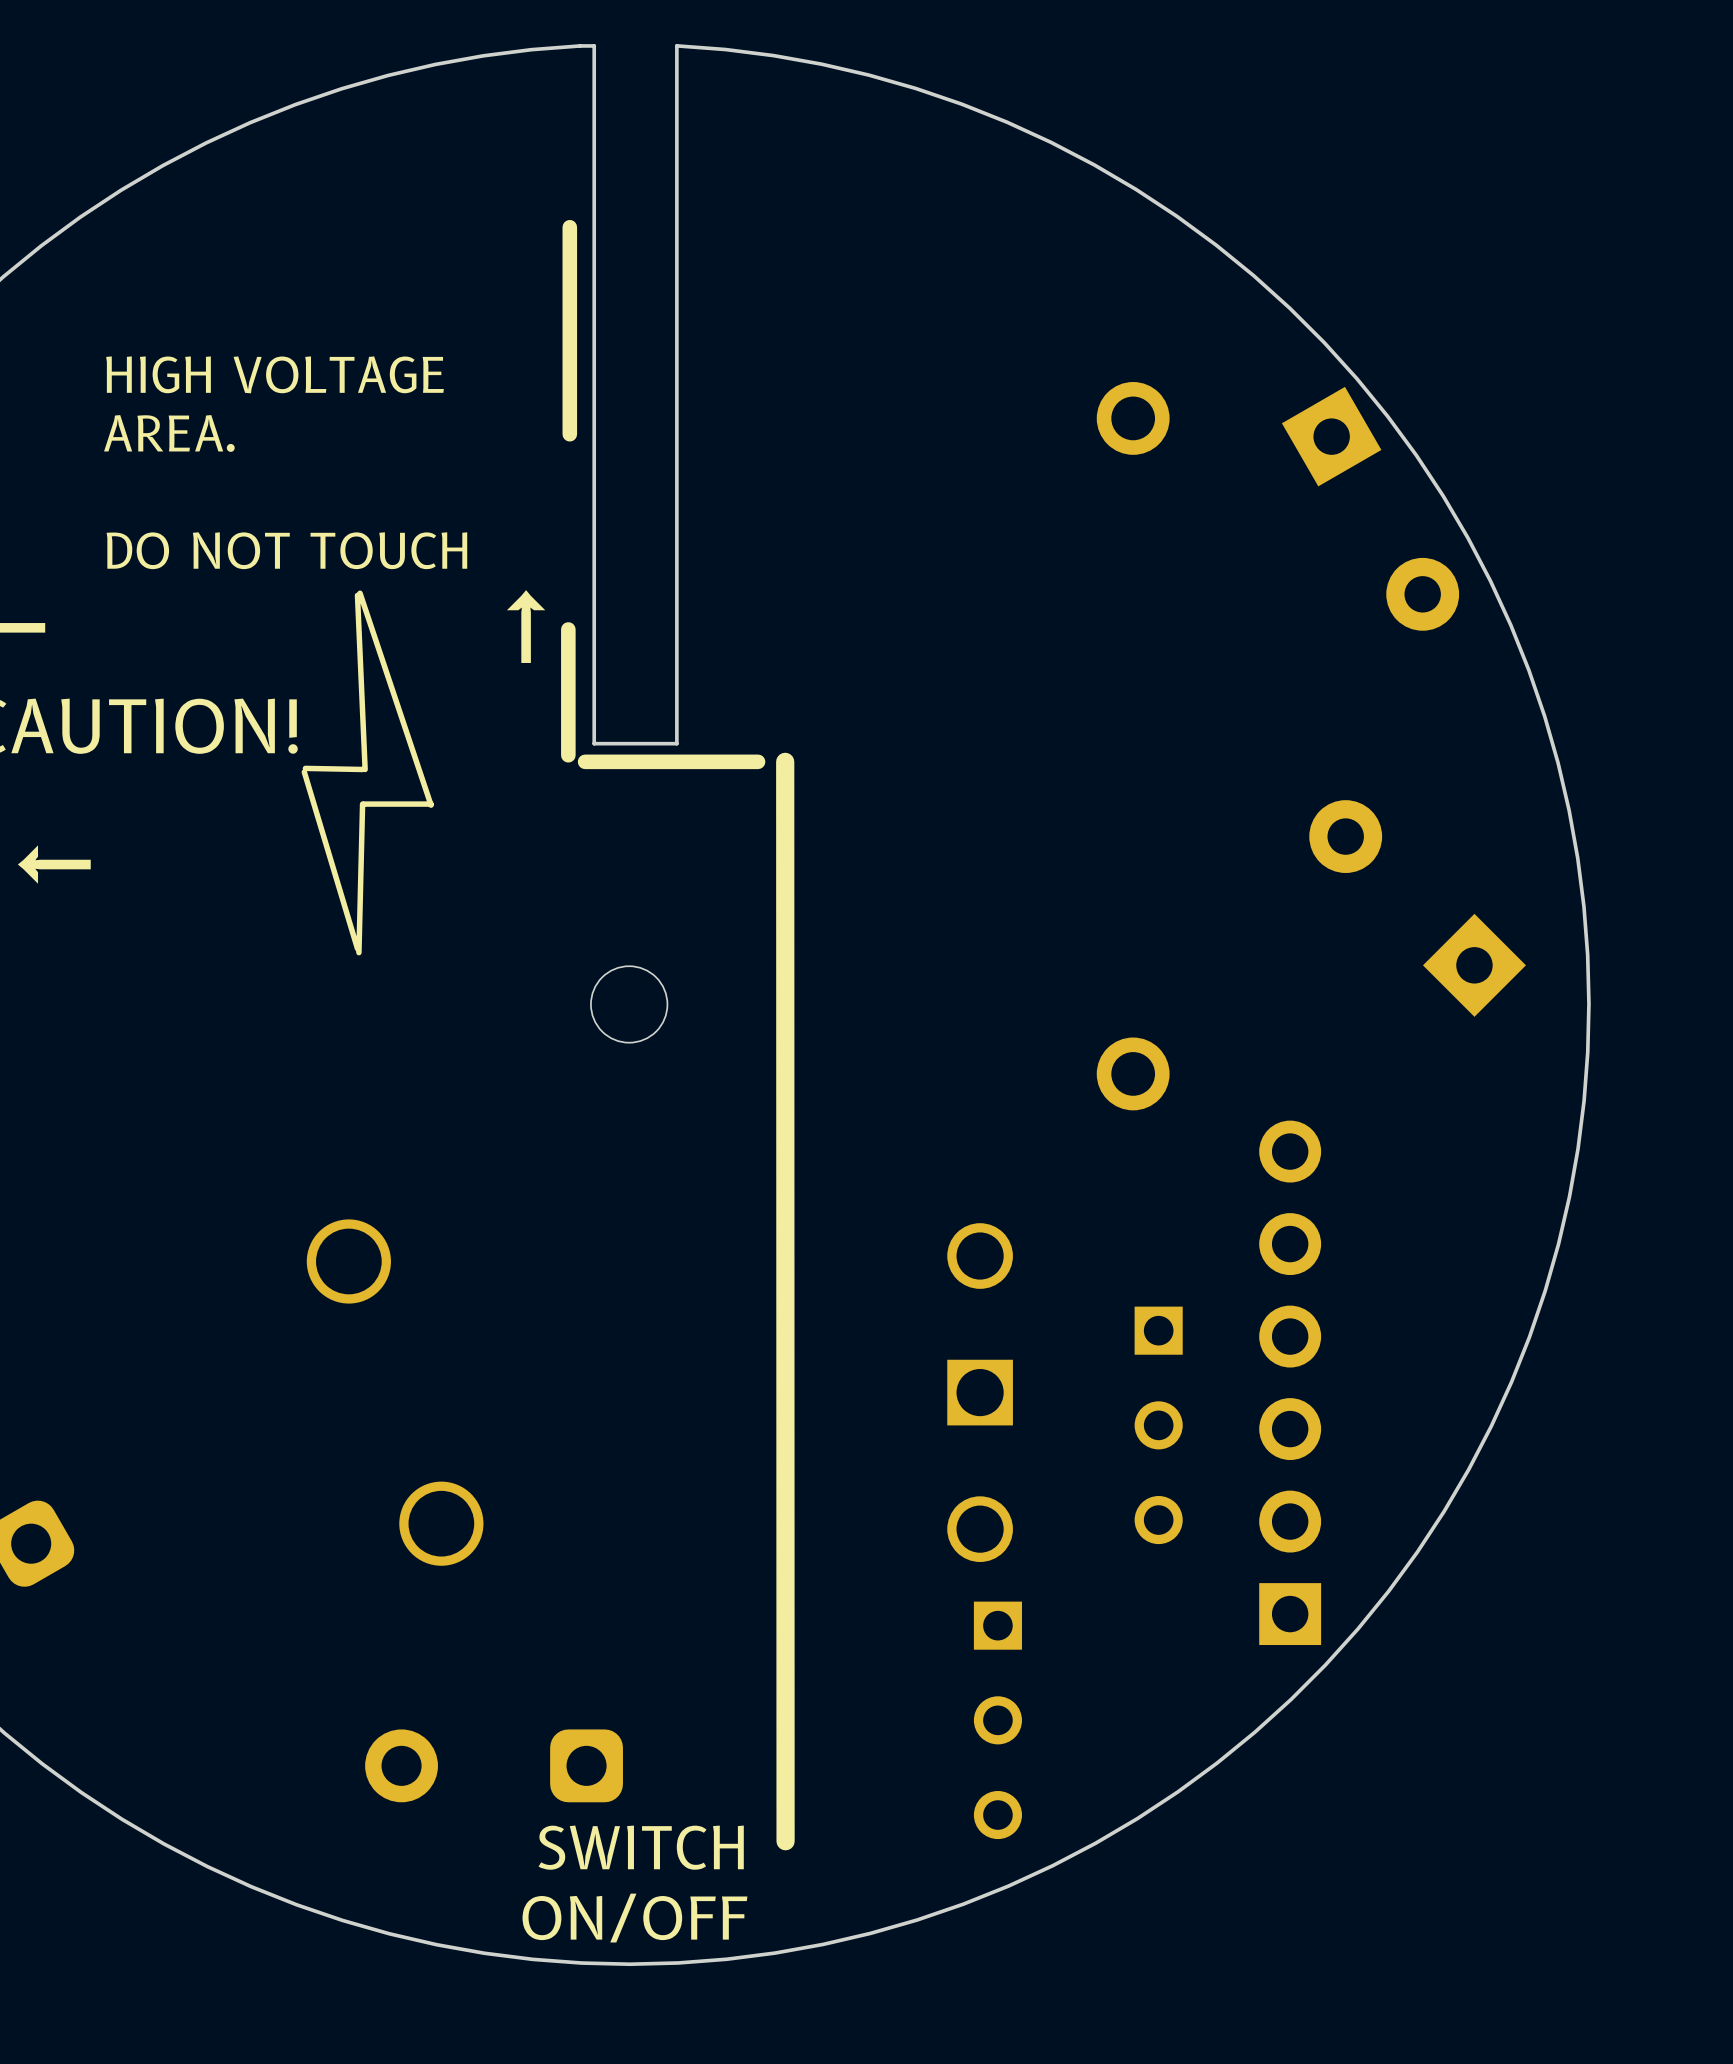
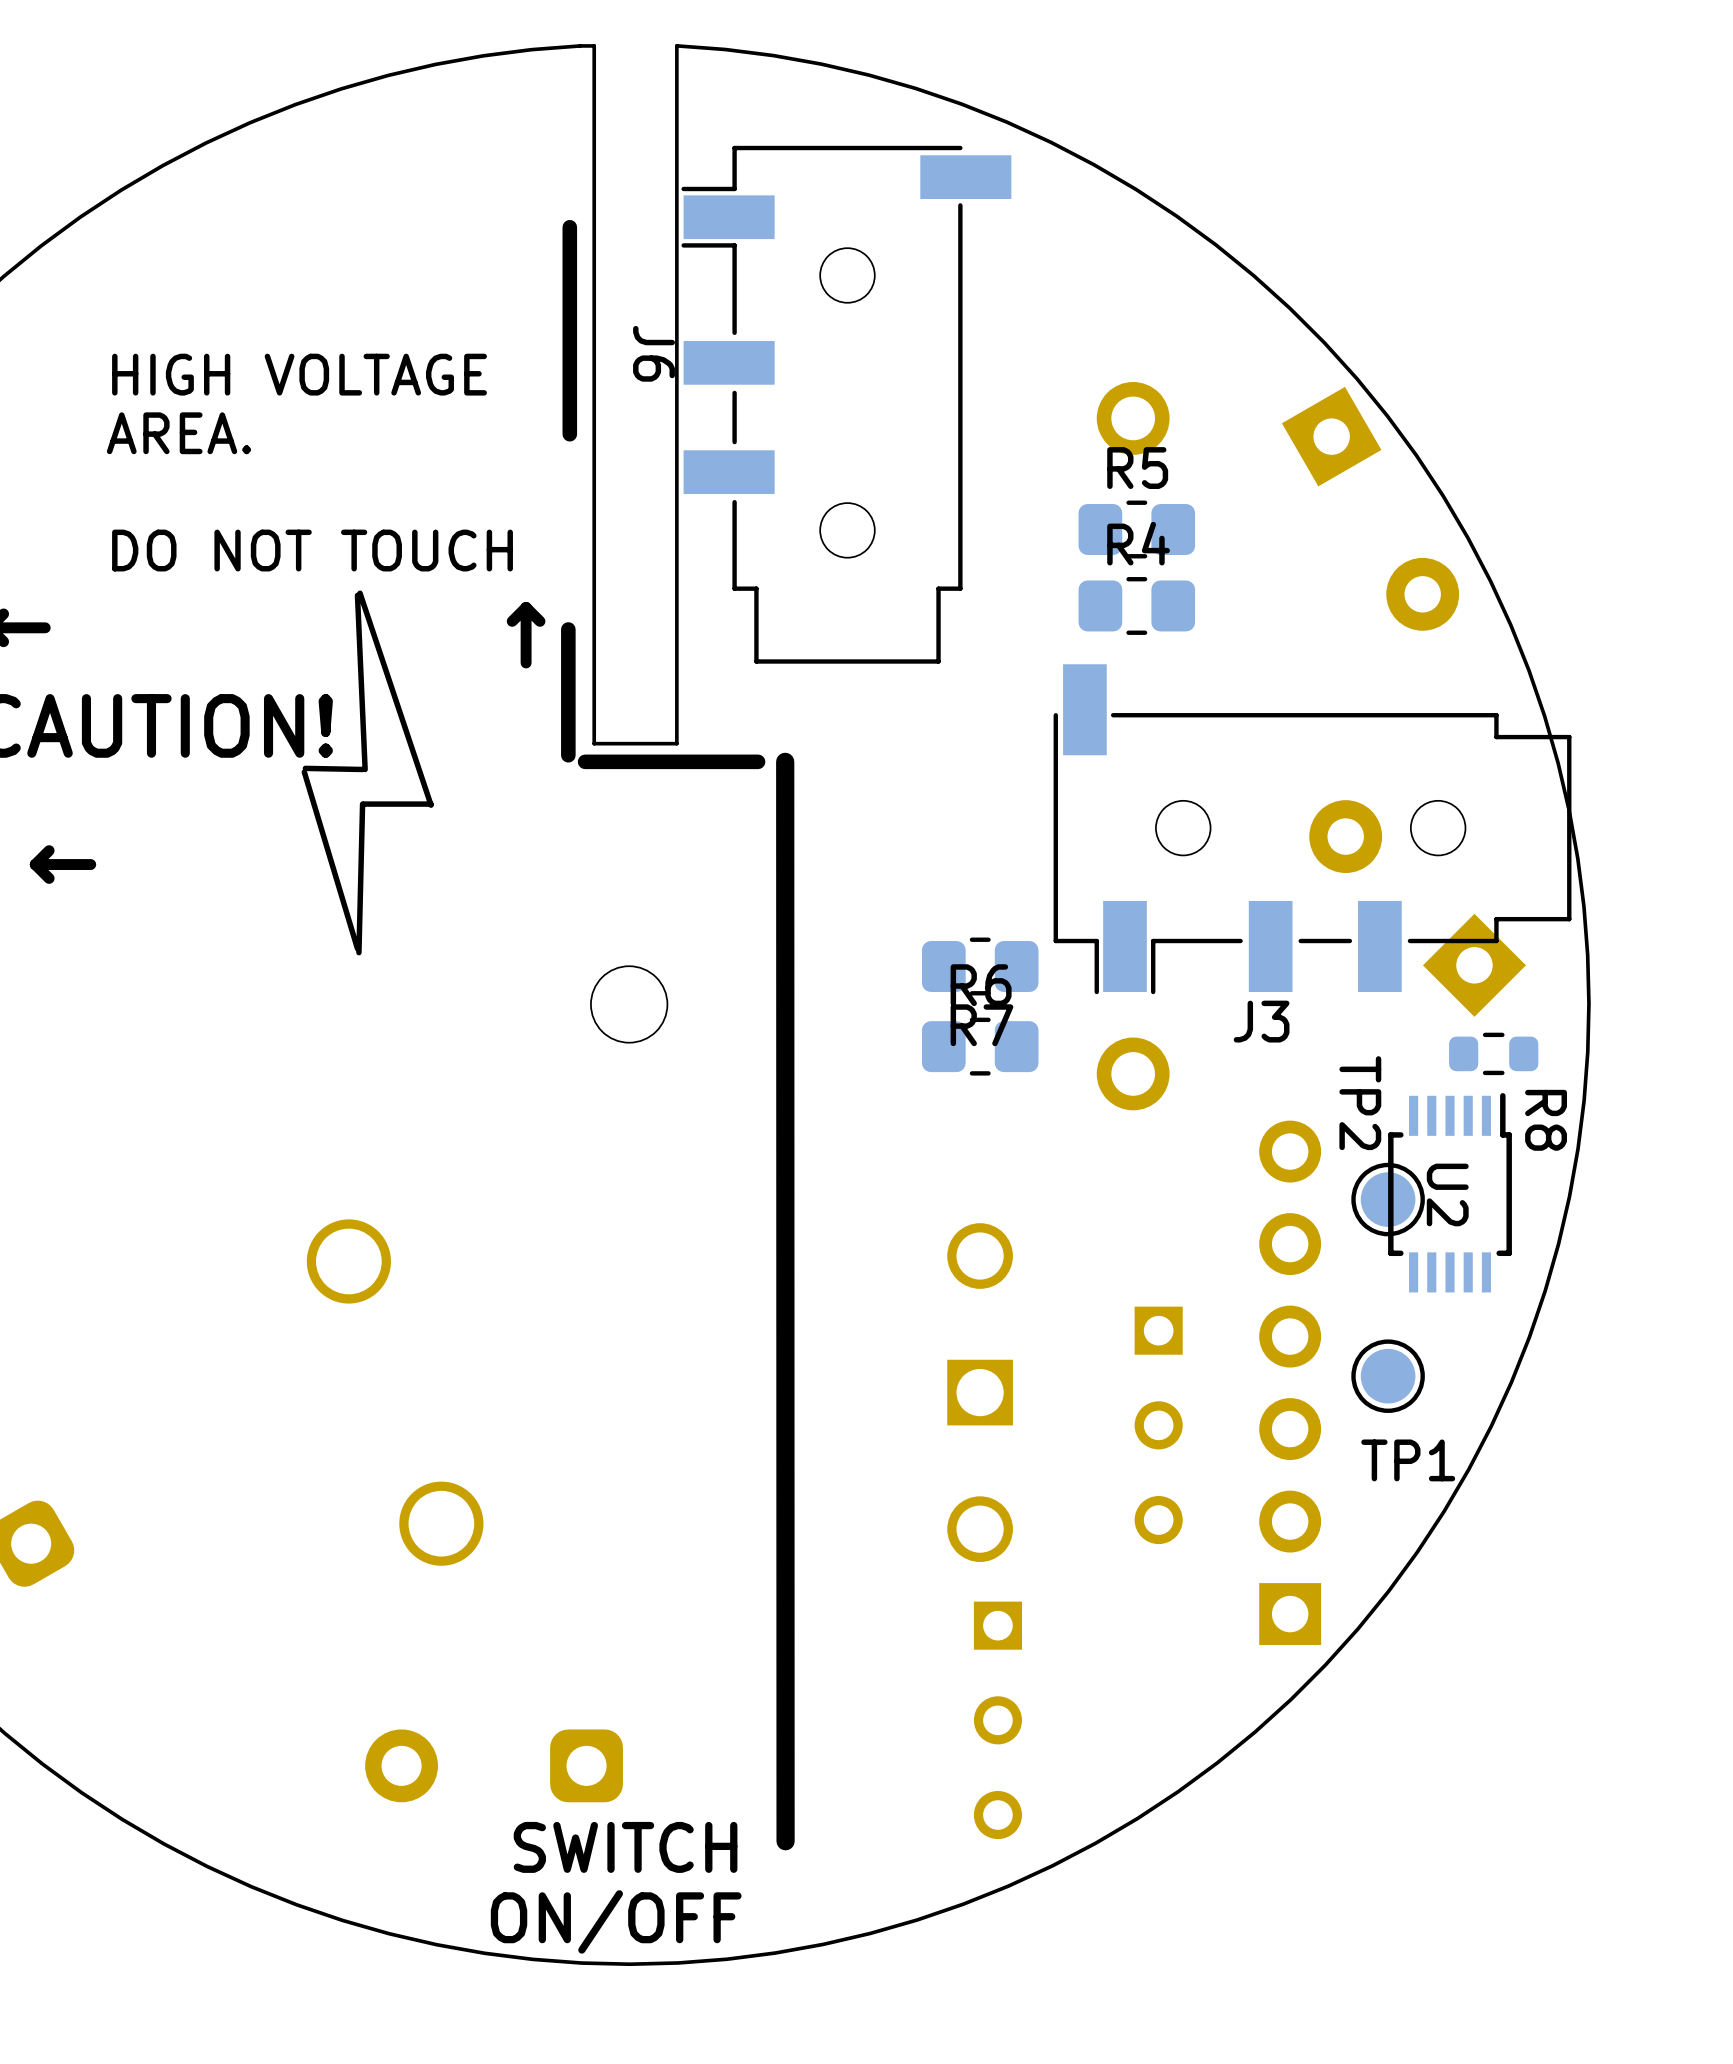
J6: none -> (846, 404)
R5: none -> (1136, 529)
R4: none -> (1136, 605)
J3: none -> (1312, 829)
R7: none -> (980, 966)
R6: none -> (980, 1046)
R8: none -> (1493, 1053)
U2: none -> (1450, 1192)
TP2: none -> (1388, 1199)
TP1: none -> (1388, 1376)

